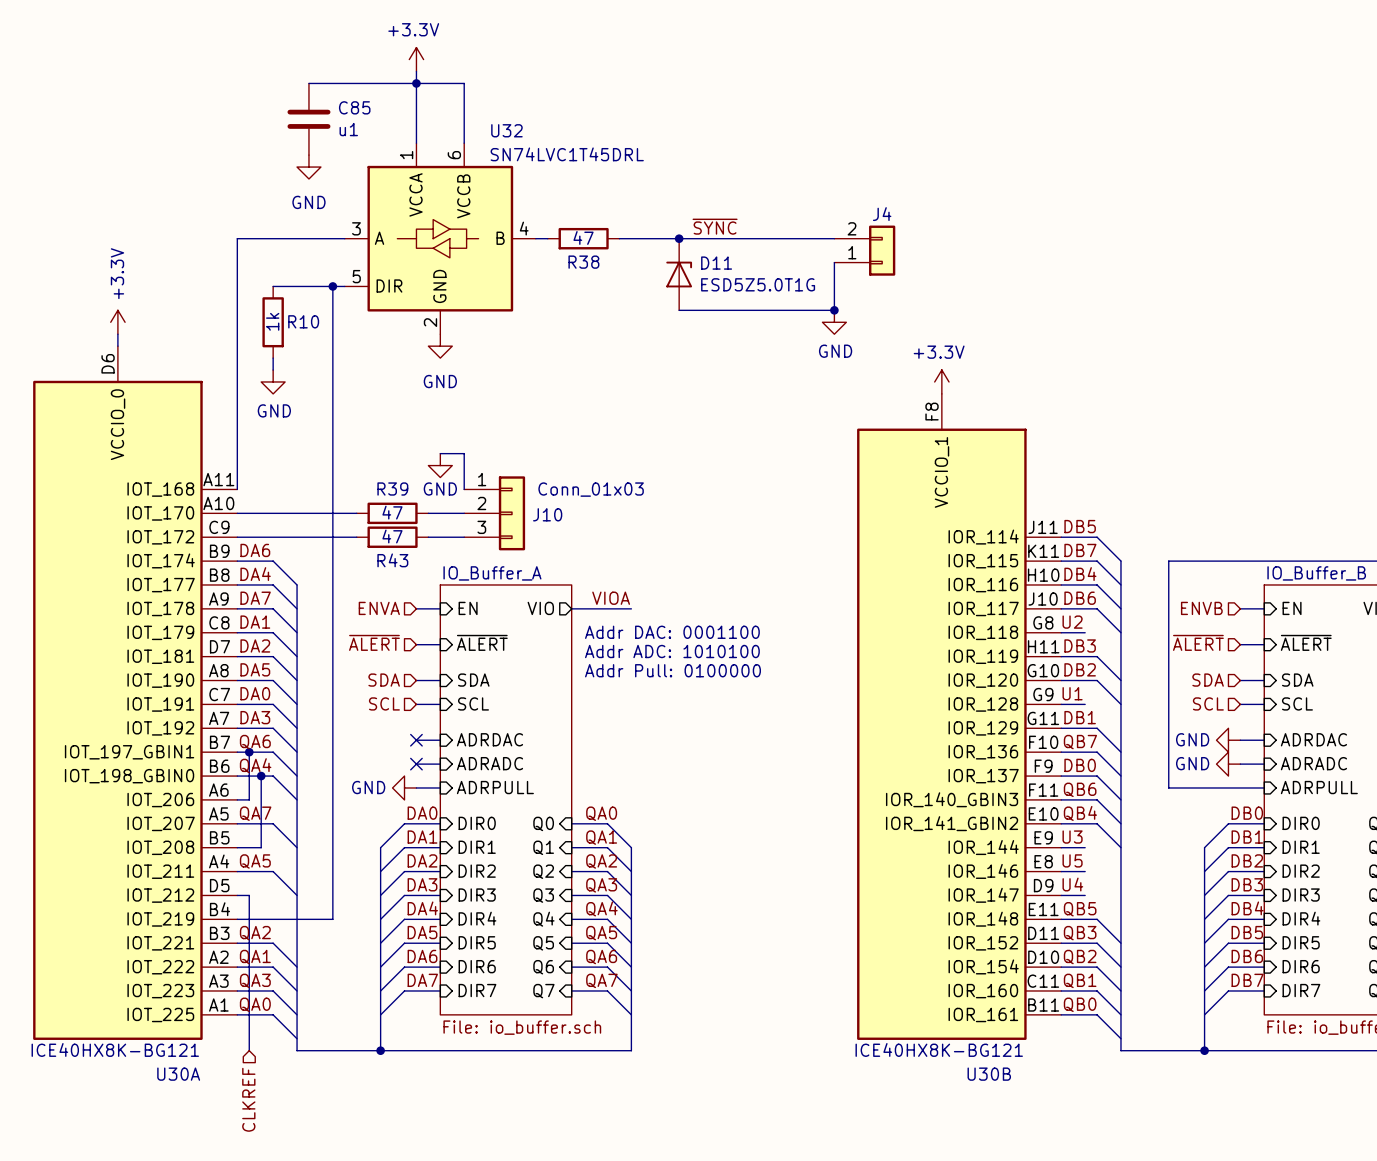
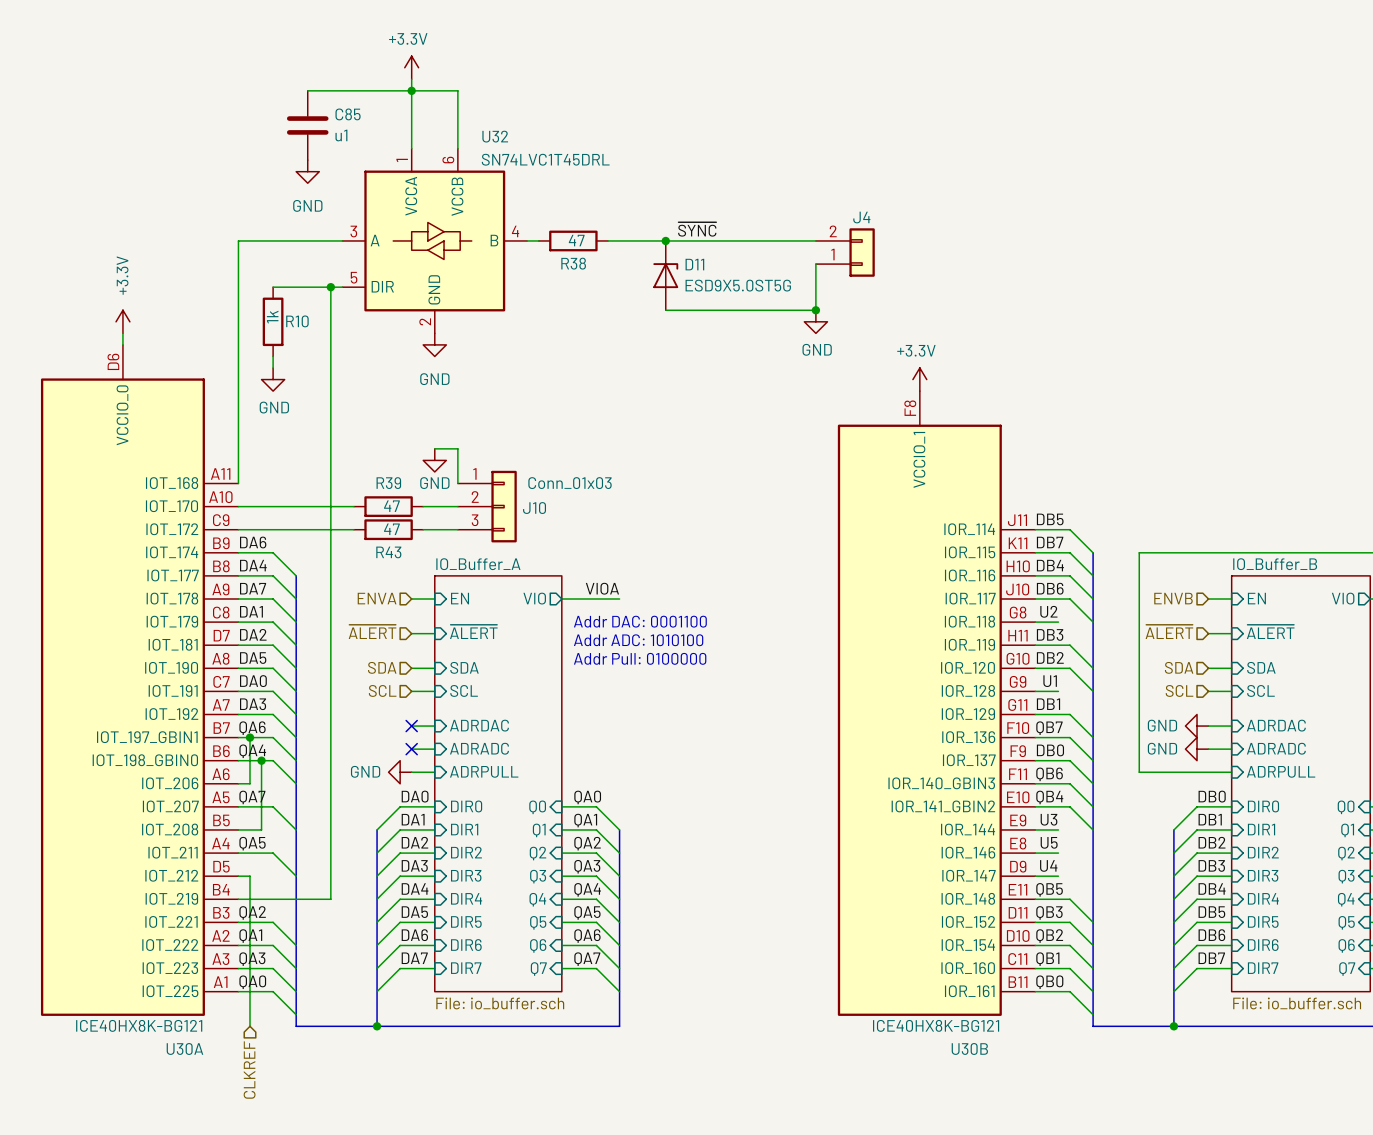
D11 value: ESD5Z5.0T1G (758, 284) -> ESD9X5.0ST5G (738, 285)

